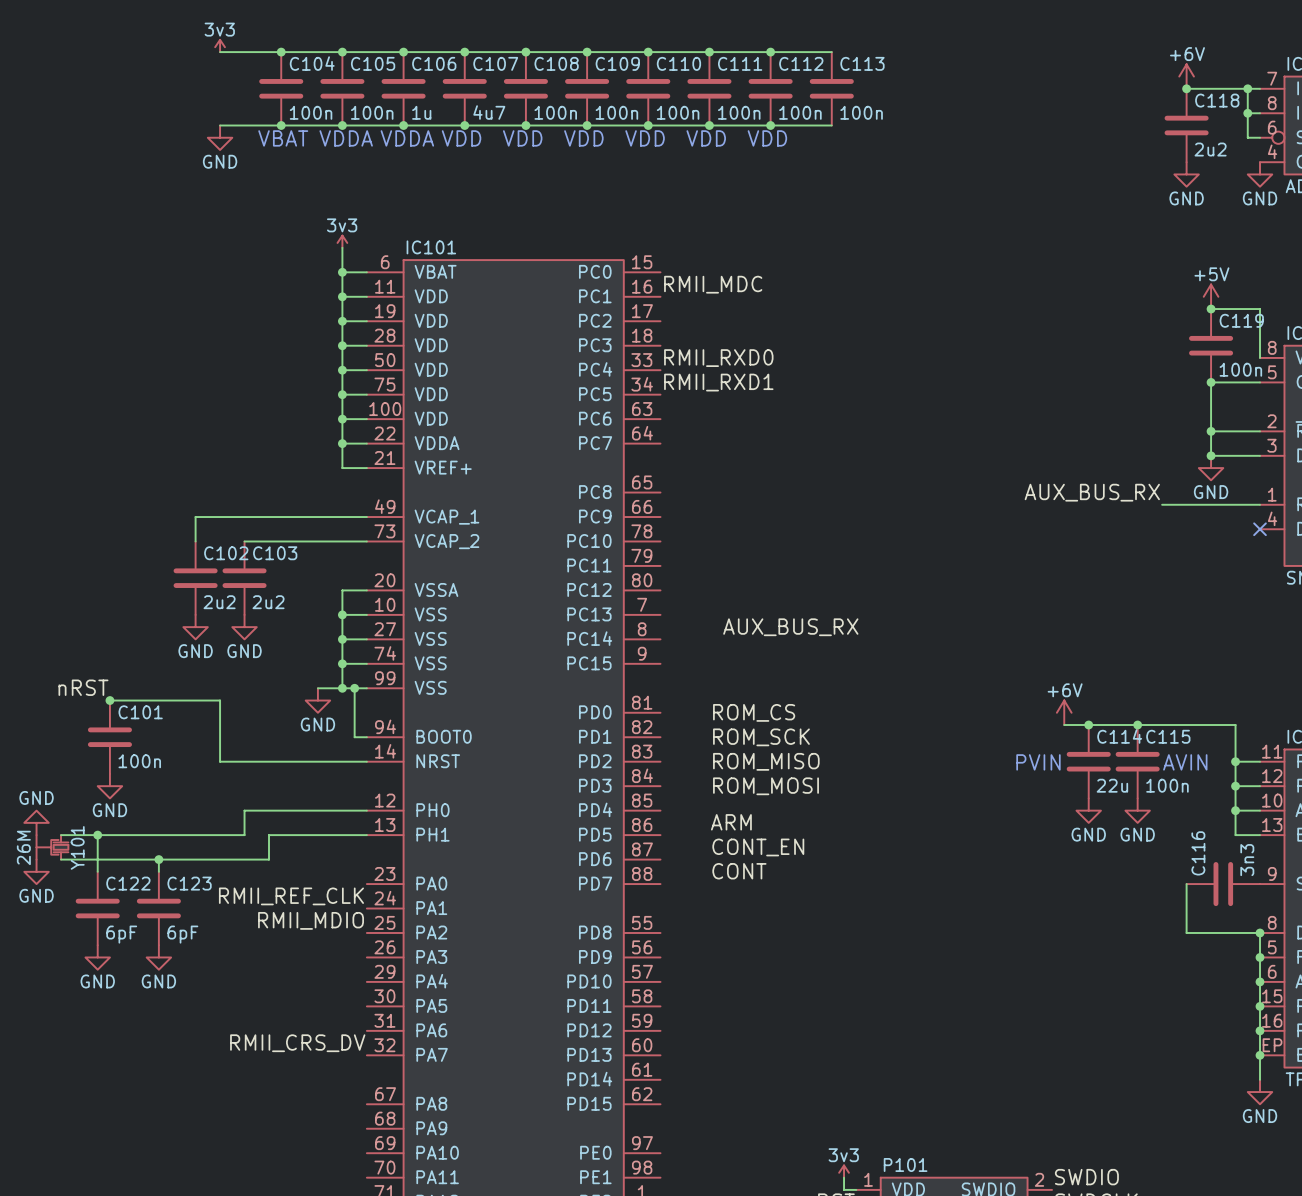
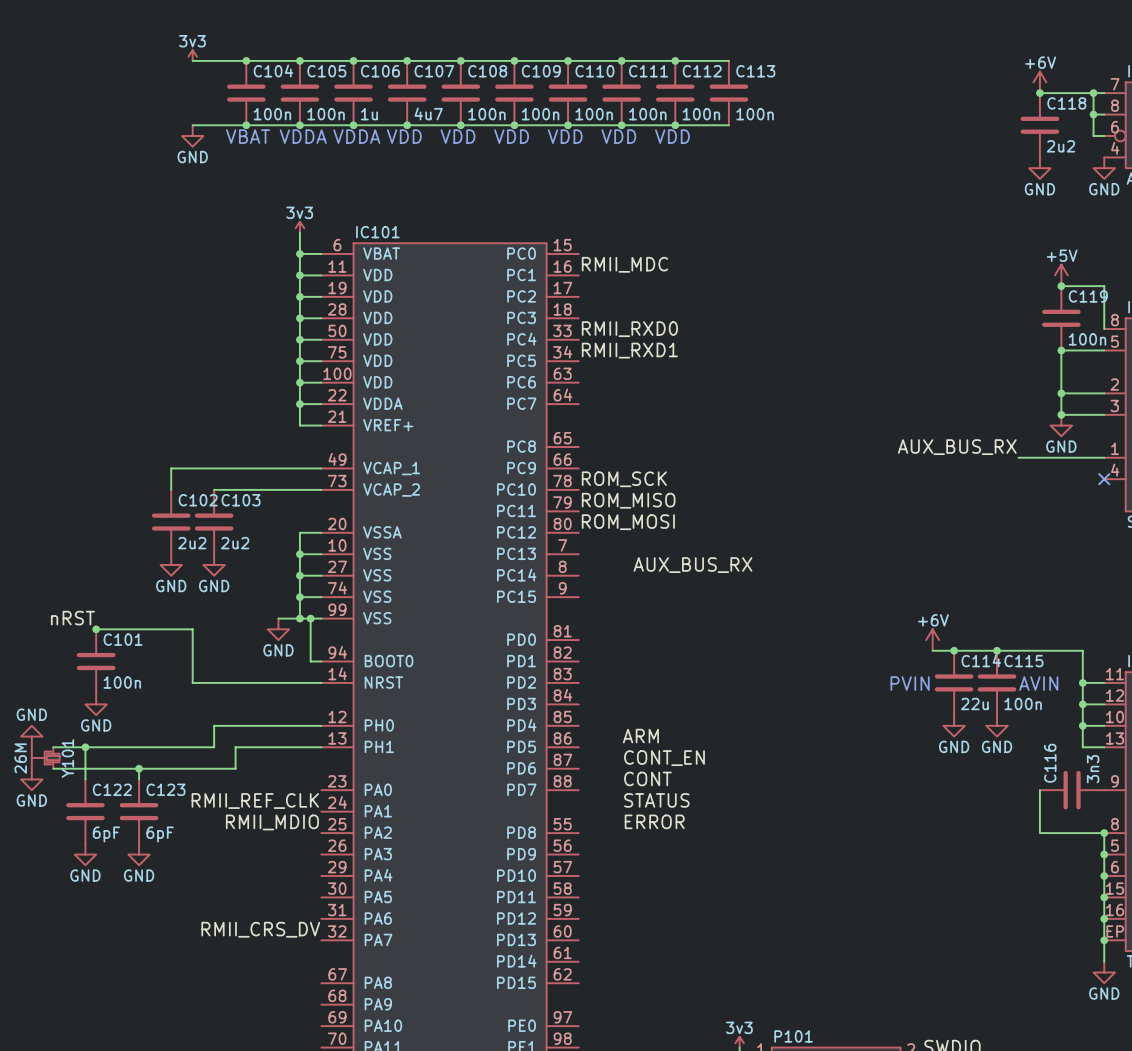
label: ROM_CS (754, 712) -> none
label position: ROM_SCK (761, 737) -> ROM_SCK (624, 479)
label position: ROM_MISO (766, 761) -> ROM_MISO (628, 500)
label position: ROM_MOSI (765, 786) -> ROM_MOSI (628, 522)
label: none -> STATUS (656, 800)
label: none -> ERROR (654, 821)

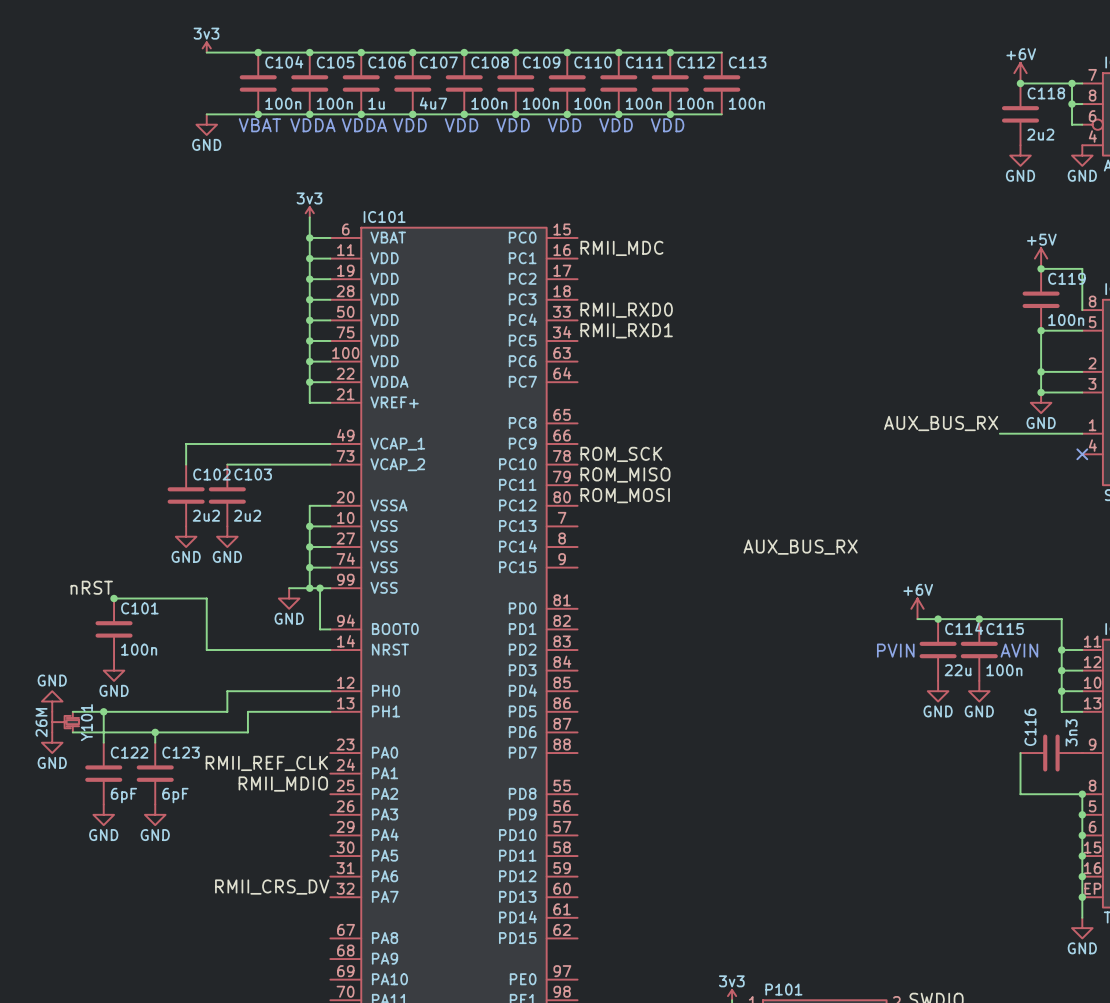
label position: AUX_BUS_RX (692, 565) -> AUX_BUS_RX (800, 547)
label: ARM (640, 736) -> none
label: CONT_EN (664, 758) -> none
label: CONT (647, 778) -> none
label: STATUS (656, 800) -> none
label: ERROR (654, 821) -> none

